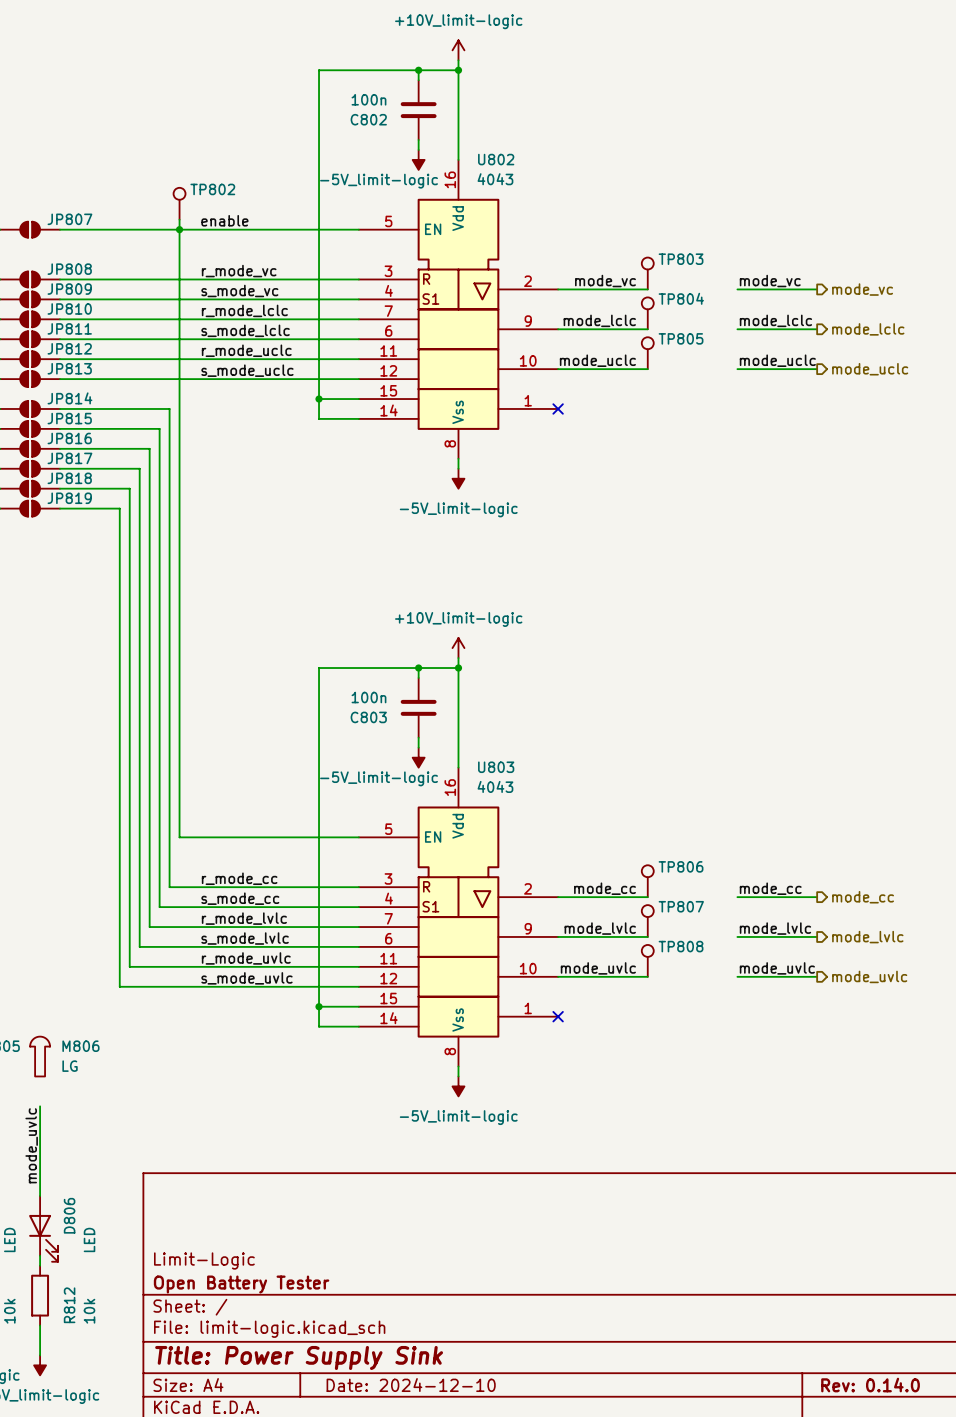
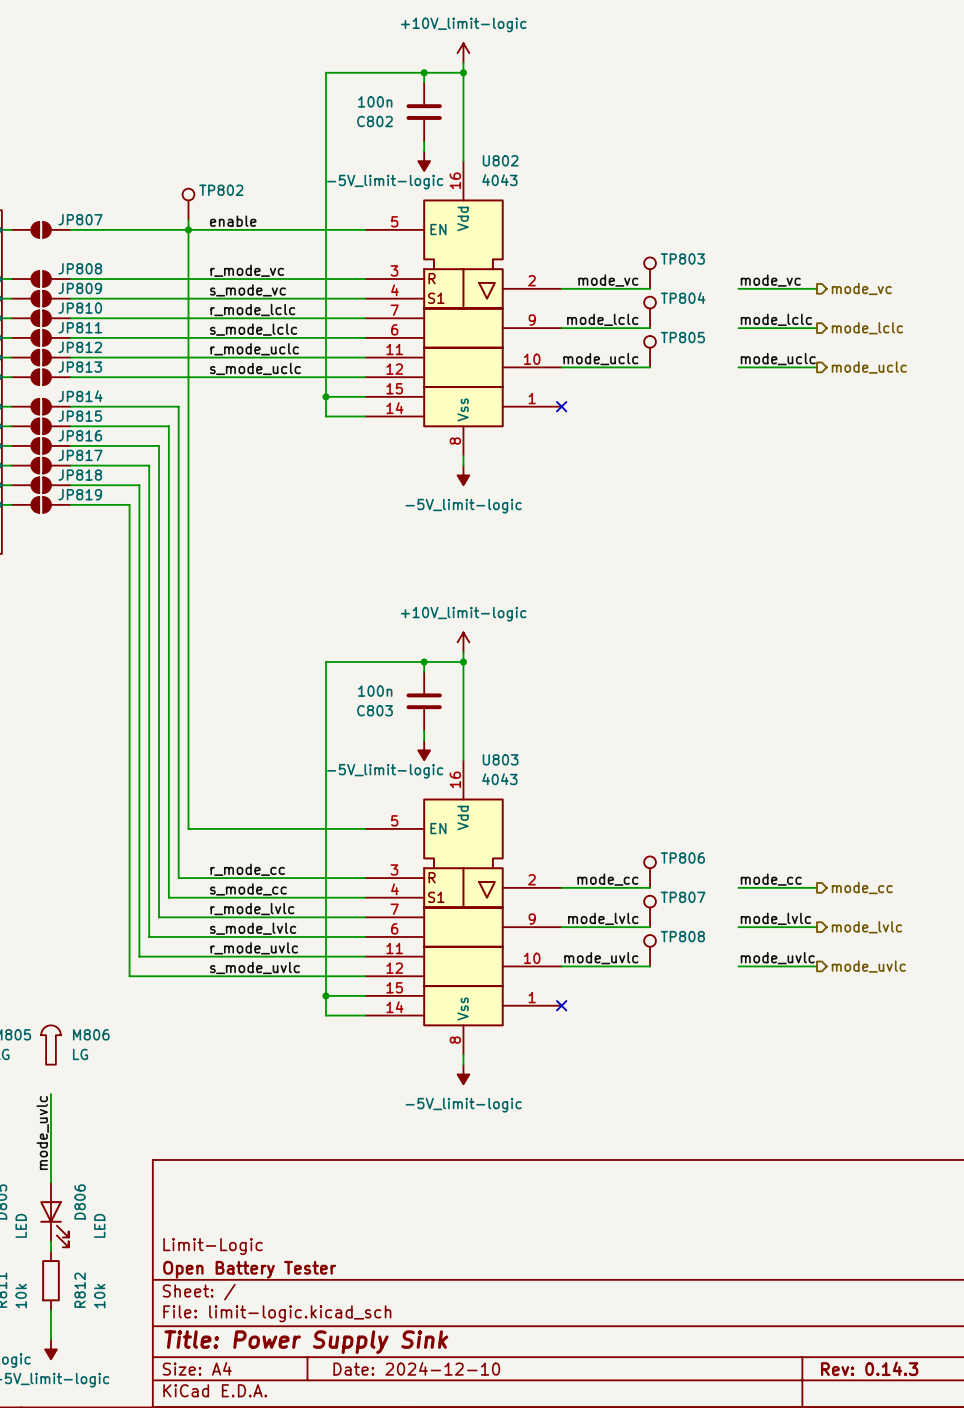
title block: Rev: 0.14.0 (870, 1385) -> Rev: 0.14.3 (869, 1368)

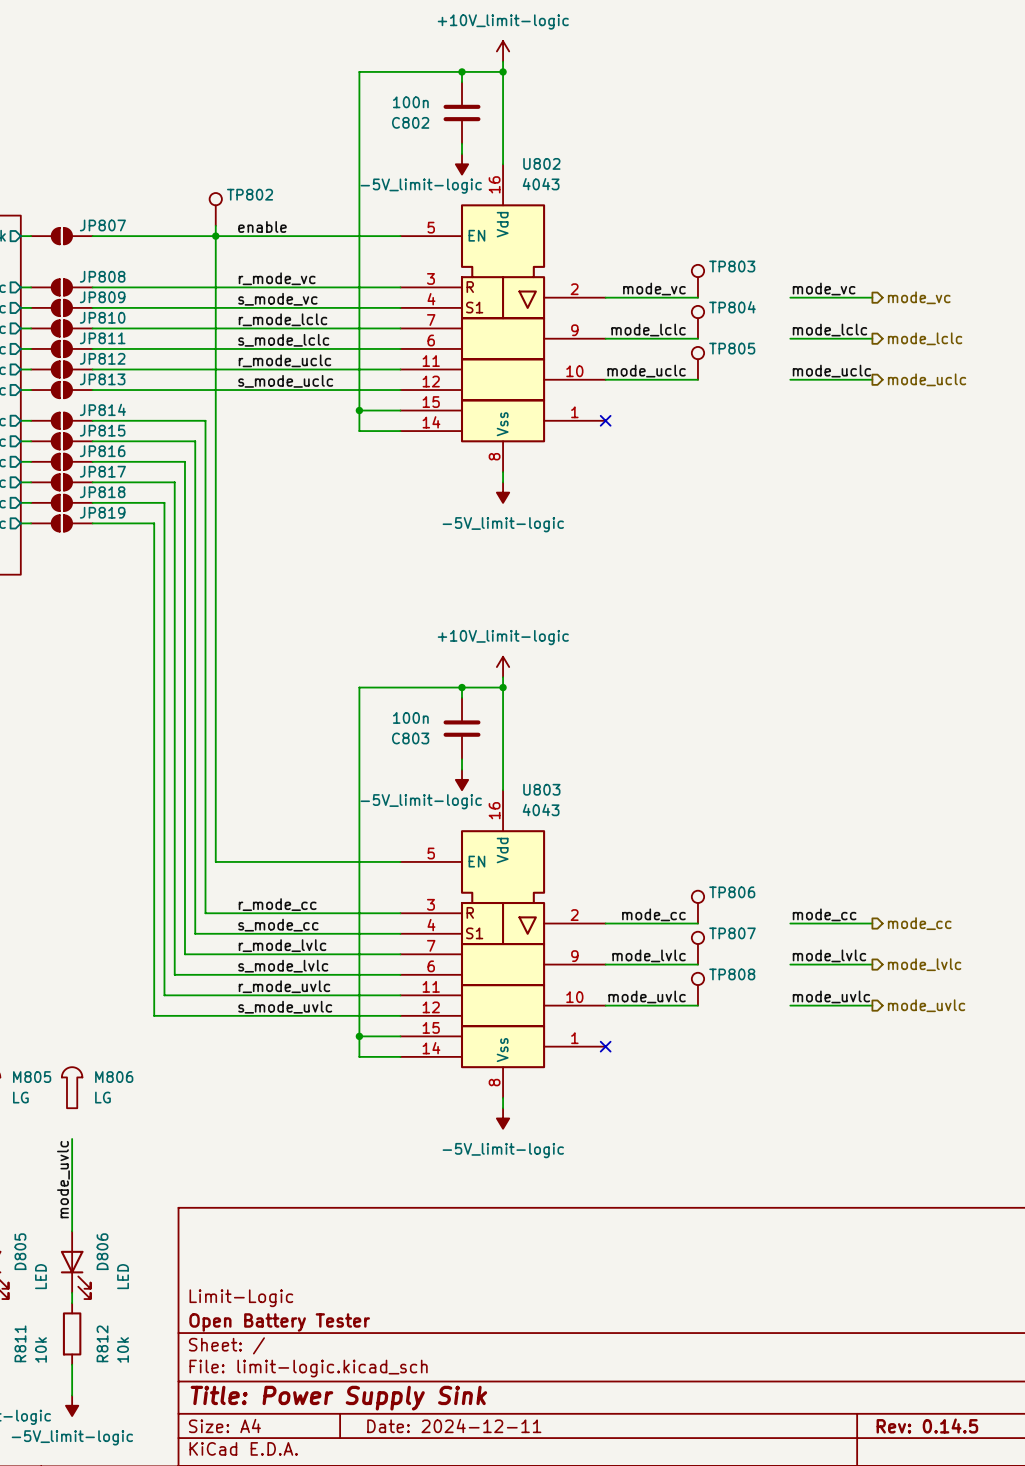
title block: Date: 2024-12-10 (416, 1368) -> Date: 2024-12-11 (454, 1426)
title block: Rev: 0.14.3 (869, 1368) -> Rev: 0.14.5 (927, 1426)

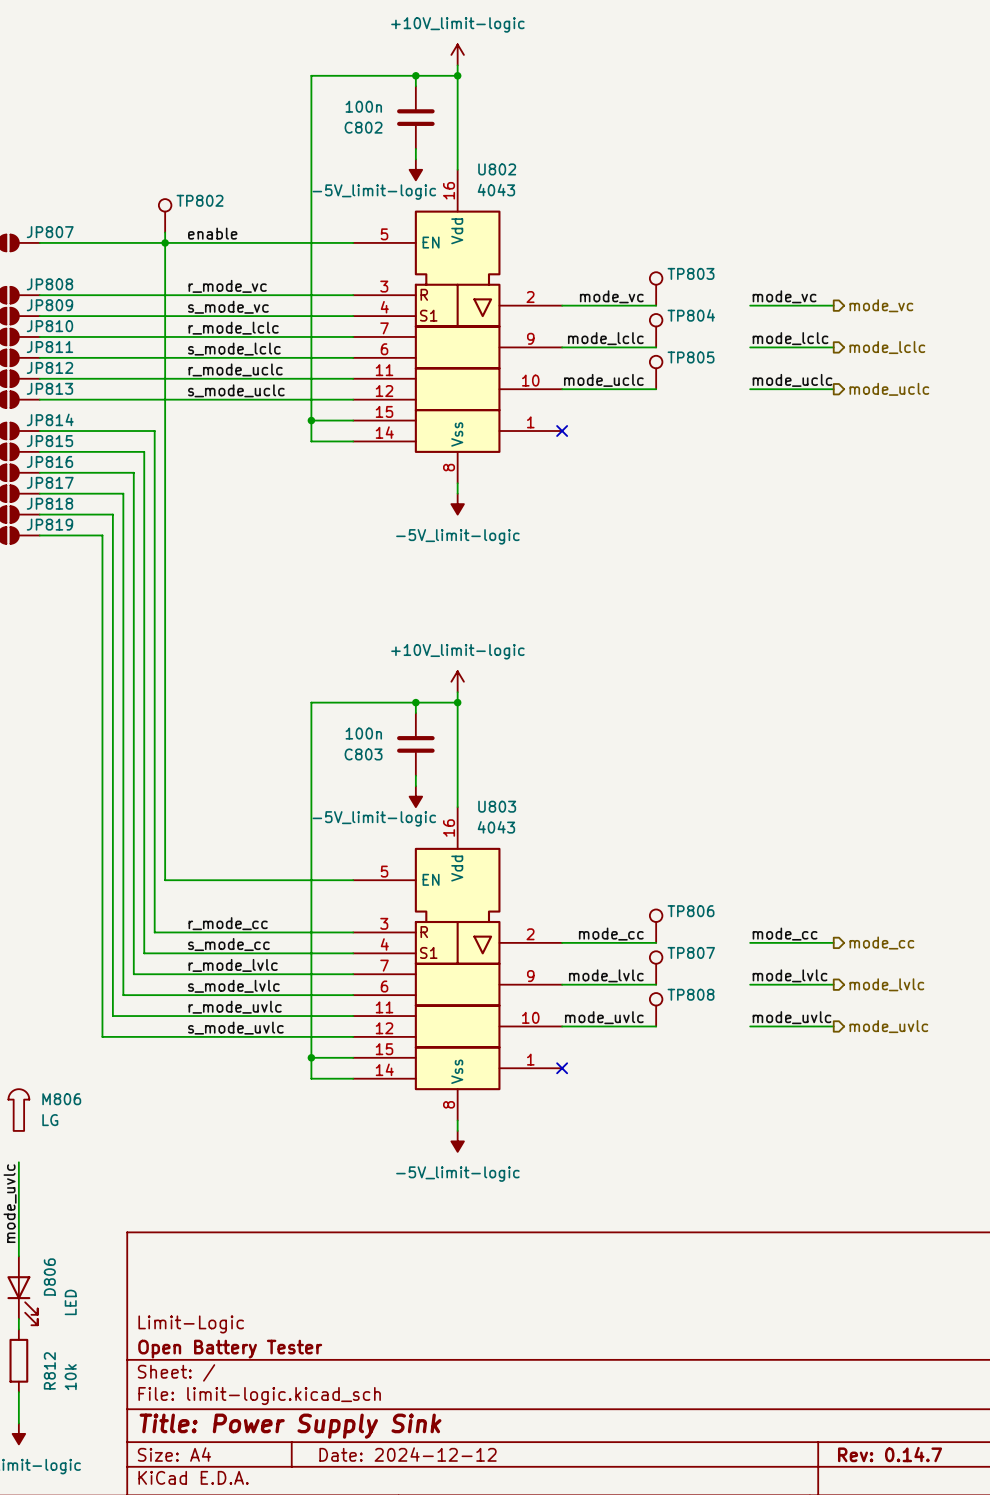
title block: Date: 2024-12-11 (454, 1426) -> Date: 2024-12-12 (408, 1454)
title block: Rev: 0.14.5 (927, 1426) -> Rev: 0.14.7 (890, 1454)

